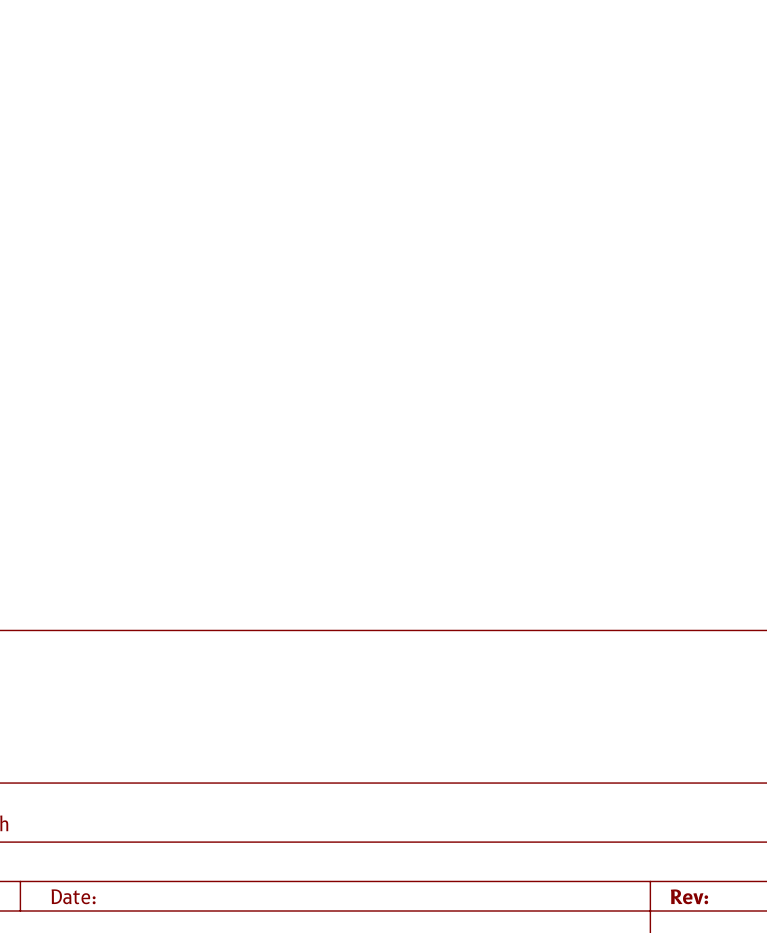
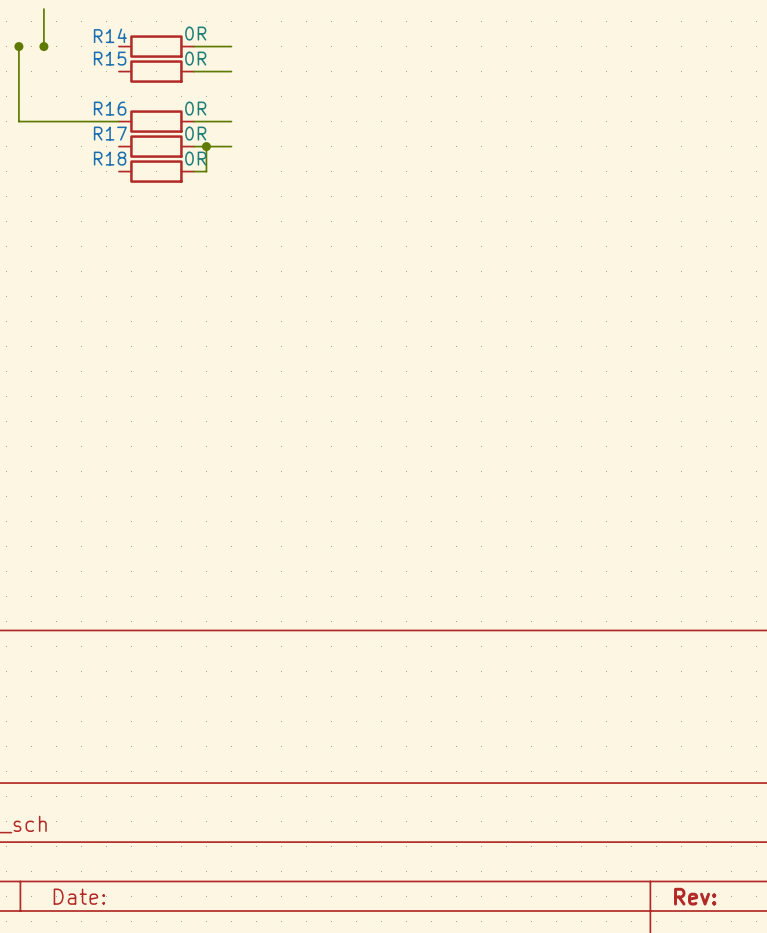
wire: none -> (43, 9) (43, 46)
wire: none -> (18, 46) (18, 121) (118, 121)
junction: none -> (18, 46)
junction: none -> (43, 46)
R14: none -> 0R (156, 46)
wire: none -> (193, 46) (231, 46)
R15: none -> 0R (156, 71)
wire: none -> (193, 71) (231, 71)
R16: none -> 0R (156, 121)
wire: none -> (193, 121) (231, 121)
R17: none -> 0R (156, 146)
wire: none -> (193, 146) (231, 146)
wire: none -> (206, 146) (206, 171) (193, 171)
junction: none -> (206, 146)
R18: none -> 0R (156, 171)

